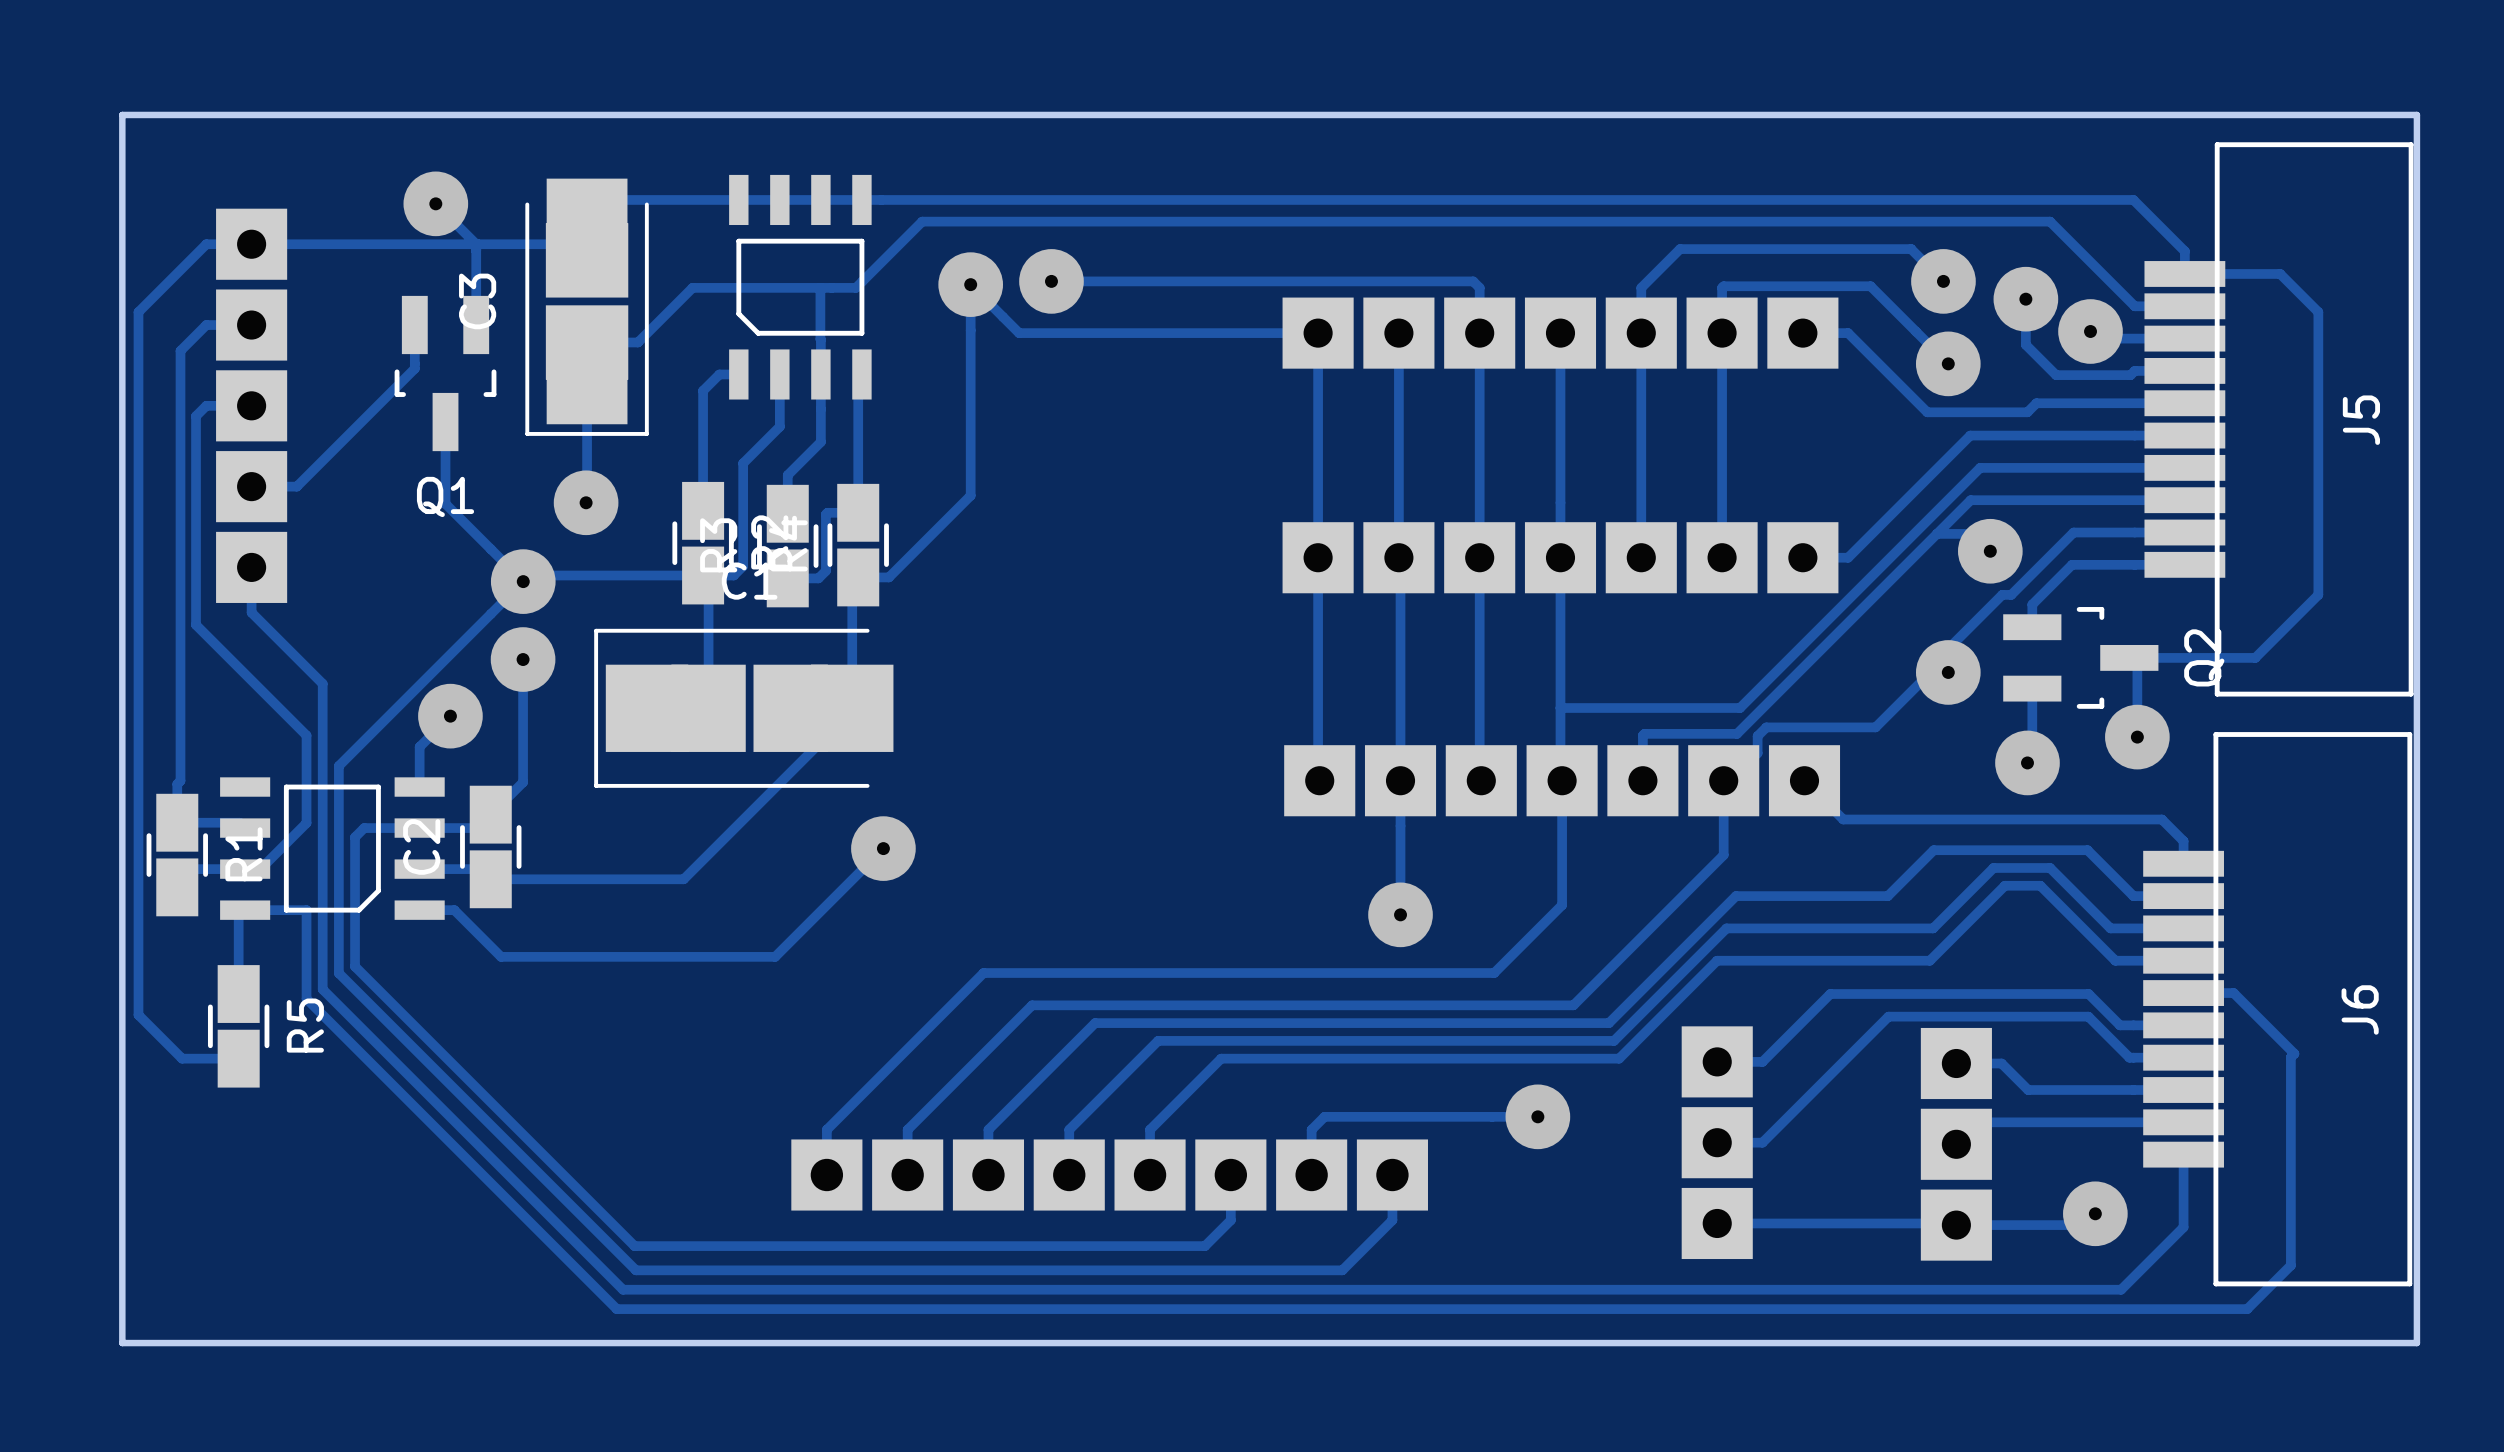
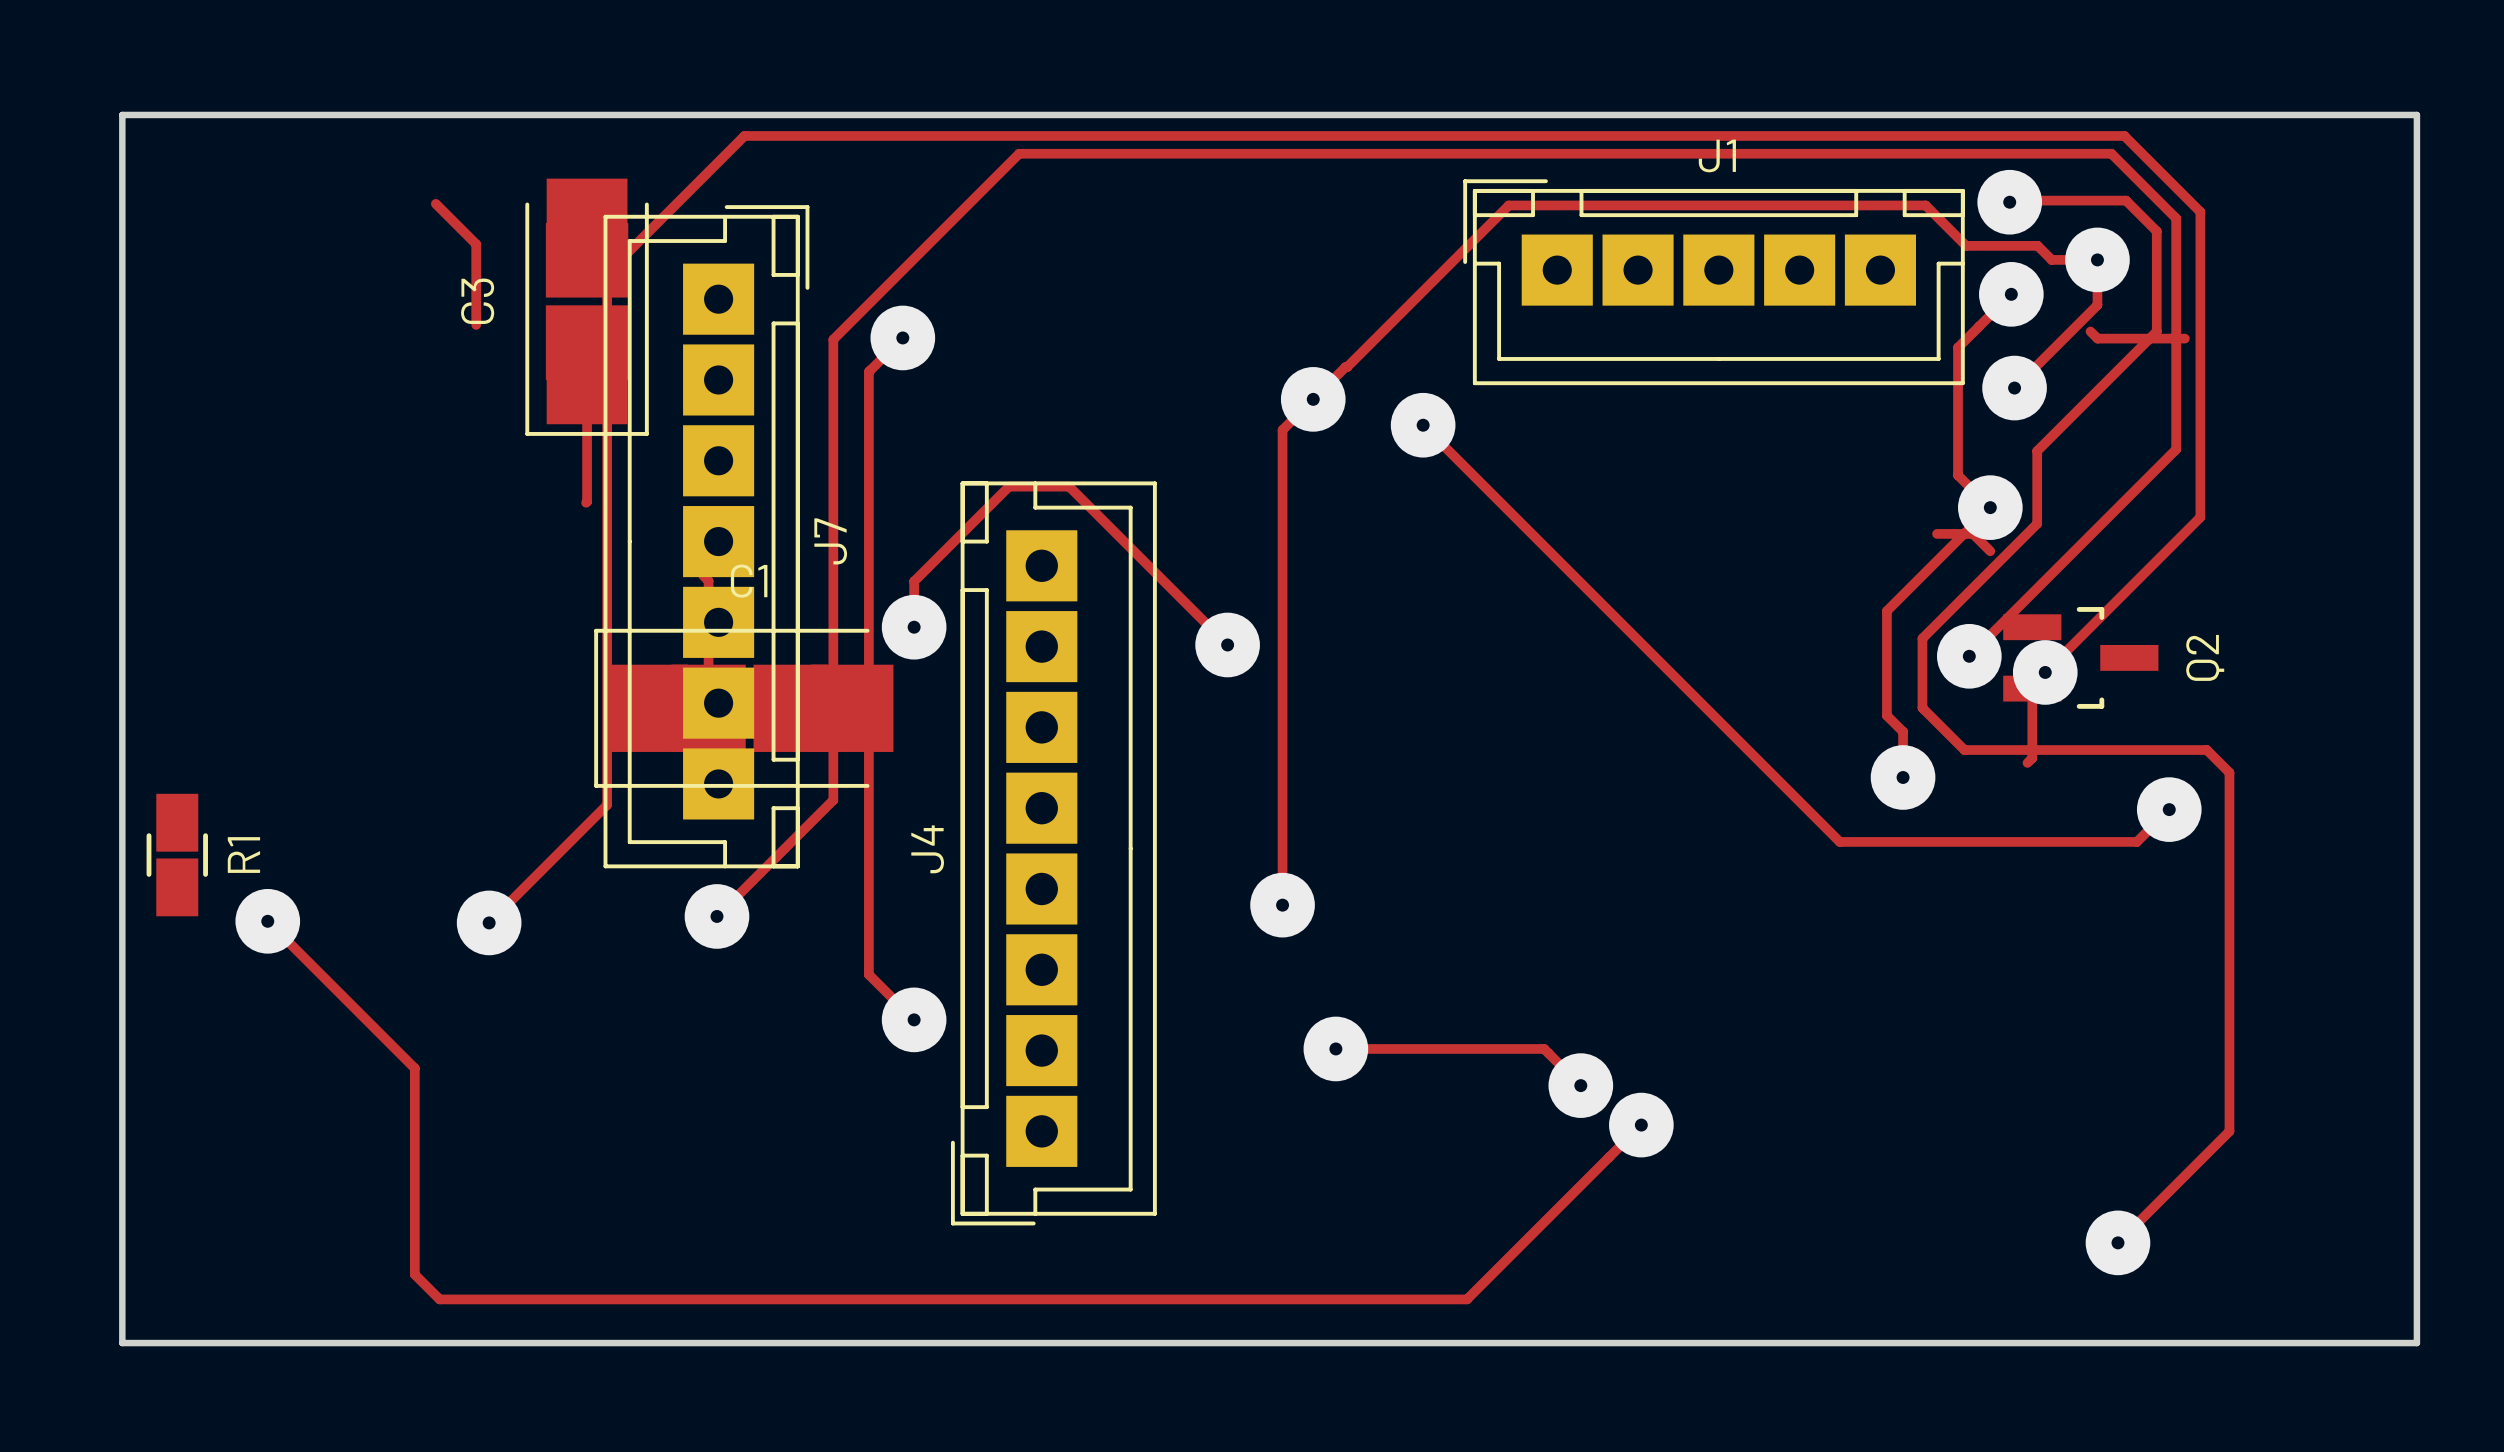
track: none -> (2009, 202) (2011, 200) (2126, 200) (2156, 231) (2156, 331) (2037, 451) (2037, 523) (1922, 638) (1922, 708) (1964, 750) (2206, 750) (2229, 772) (2229, 1131) (2117, 1242)
via: none -> (2009, 202)
via: (435, 203) -> none
track: (587, 219) (606, 199) (2133, 199) (2184, 251) (2184, 273) (2280, 273) (2318, 312) (2318, 594) (2255, 657) (2129, 657) (2137, 665) (2137, 737) -> none
via: none -> (2097, 259)
track: (587, 260) (570, 244) (206, 244) (138, 312) (138, 1015) (182, 1058) (238, 1058) -> none
track: (1051, 281) (1473, 281) (1479, 287) (1479, 779) (1481, 780) -> none
via: (1051, 281) -> none
track: (1943, 281) (1911, 249) (1680, 249) (1641, 287) (1641, 557) -> none
via: (1943, 281) -> none
J1: none -> (1714, 282)
via: (970, 284) -> none
part: (800, 287) -> none
track: (820, 287) (820, 442) (787, 475) (787, 513) -> none
track: none -> (2011, 294) (1958, 347) (1958, 475) (1990, 507) (1886, 611) (1886, 715) (1903, 731) (1903, 777)
track: (2025, 299) (2025, 344) (2056, 375) (2130, 375) (2134, 370) (2184, 370) -> none
via position: (2025, 299) -> (2011, 294)
track: (2184, 306) (2134, 306) (2050, 221) (922, 221) (855, 287) (692, 287) (637, 342) (587, 342) -> none
track: (251, 325) (206, 325) (180, 350) (180, 780) (177, 784) (177, 822) (239, 822) (245, 828) -> none
track: (414, 325) (414, 368) (296, 486) (251, 486) -> none
via: (2090, 331) -> none
track: (1398, 333) (1400, 914) -> none
track: (1560, 333) (1562, 905) (1494, 973) (983, 973) (826, 1129) (826, 1175) -> none
part: (1560, 333) -> none
track: (1802, 333) (1848, 333) (1927, 412) (2027, 412) (2036, 403) (2184, 403) -> none
track: none -> (902, 337) (868, 371) (868, 974) (914, 1019)
via: none -> (902, 337)
track: (1948, 363) (1870, 286) (1723, 286) (1722, 287) (1722, 557) -> none
via: (1948, 363) -> none
Q1: (445, 373) -> none
track: (738, 374) (719, 374) (703, 390) (703, 510) -> none
track: (779, 374) (779, 426) (743, 463) (743, 566) (733, 575) (529, 575) (338, 766) (338, 973) (635, 1270) (1342, 1270) (1392, 1220) (1392, 1175) -> none
track: (861, 374) (858, 378) (858, 512) (827, 512) (825, 514) (825, 570) (818, 578) (787, 578) -> none
track: none -> (2014, 388) (2097, 305) (2097, 259) (2051, 259) (2037, 245) (1966, 245) (1925, 205) (1508, 205) (1282, 430) (1282, 905)
via: none -> (2014, 388)
via: none -> (1313, 399)
track: (251, 405) (206, 405) (196, 416) (196, 624) (306, 735) (306, 823) (260, 869) (195, 869) (177, 887) -> none
part: (251, 405) -> none
J5: (2279, 419) -> none
track: (445, 422) (445, 503) (523, 581) -> none
track: none -> (1423, 425) (1839, 841) (2136, 841) (2169, 809)
via: none -> (1423, 425)
track: (2184, 435) (1970, 435) (1848, 557) (1802, 557) -> none
track: (2184, 467) (1980, 467) (1740, 708) (1560, 708) -> none
track: (2184, 500) (1970, 500) (1737, 733) (1644, 733) (1642, 735) (1642, 780) -> none
via: (586, 502) -> none
track: (2184, 532) (2073, 532) (2011, 594) (2002, 594) (1938, 658) (1938, 664) -> none
J7: none -> (706, 536)
part: (703, 543) -> none
part: (858, 545) -> none
part: (787, 546) -> none
via position: (1990, 551) -> (1990, 507)
part: (1560, 557) -> none
track: (2184, 564) (2072, 564) (2032, 604) (2032, 627) -> none
track: (251, 567) (251, 612) (322, 683) (322, 989) (623, 1289) (2121, 1289) (2183, 1227) (2183, 1154) -> none
via: (523, 581) -> none
track: none -> (914, 627) (914, 581) (1009, 486) (1069, 486) (1227, 644)
via: none -> (914, 627)
via: none -> (1227, 644)
track: none -> (1969, 656) (2176, 449) (2176, 218) (2111, 153) (1019, 153) (833, 339) (833, 800) (716, 916)
track: (523, 659) (523, 782) (477, 828) (364, 828) (355, 837) (355, 966) (634, 1246) (1204, 1246) (1230, 1220) (1230, 1175) -> none
via: (523, 659) -> none
track: (1938, 664) (1875, 727) (1766, 727) (1757, 736) (1757, 753) (1730, 780) (1723, 780) (1723, 855) (1573, 1005) (1032, 1005) (907, 1129) (907, 1175) -> none
via position: (1948, 672) -> (1969, 656)
track: none -> (2045, 672) (2200, 517) (2200, 211) (2124, 135) (744, 135) (607, 273) (607, 804) (489, 922)
via: none -> (2045, 672)
track: (450, 716) (419, 746) (419, 787) -> none
via: (450, 716) -> none
via: (2137, 737) -> none
via: (2027, 762) -> none
via: none -> (1903, 777)
track: (1319, 780) (1318, 779) (1318, 333) (1019, 333) (970, 284) (970, 495) (888, 577) (858, 577) (852, 583) (852, 710) (683, 879) (490, 879) (480, 869) (419, 869) -> none
part: (1562, 780) -> none
track: (1804, 780) (1843, 819) (2161, 819) (2183, 841) (2183, 863) -> none
via: none -> (2169, 809)
part: (490, 846) -> none
part: (332, 848) -> none
track: (883, 848) (775, 956) (501, 956) (454, 910) (419, 910) -> none
via: (883, 848) -> none
track: (2183, 896) (2133, 896) (2087, 850) (1933, 850) (1887, 896) (1735, 896) (1608, 1023) (1095, 1023) (988, 1129) (988, 1175) -> none
via: none -> (1282, 905)
via: (1400, 914) -> none
via: none -> (716, 916)
track: none -> (267, 921) (414, 1068) (414, 1274) (439, 1299) (1466, 1299) (1641, 1125)
via: none -> (267, 921)
via: none -> (489, 922)
track: (2183, 928) (2110, 928) (2050, 867) (1993, 867) (1933, 928) (1726, 928) (1614, 1040) (1158, 1040) (1069, 1129) (1069, 1175) -> none
track: (2183, 960) (2115, 960) (2040, 885) (2004, 885) (1929, 960) (1717, 960) (1619, 1058) (1221, 1058) (1150, 1129) (1150, 1175) -> none
track: (2183, 993) (2233, 993) (2294, 1053) (2290, 1057) (2290, 1265) (2247, 1309) (616, 1309) (306, 998) (306, 910) (245, 910) (238, 916) (238, 994) -> none
J6: (2277, 1009) -> none
via: none -> (914, 1019)
track: (2183, 1025) (2120, 1025) (2088, 994) (1830, 994) (1762, 1061) (1717, 1061) -> none
R5: (238, 1026) -> none
track: none -> (1335, 1048) (1544, 1048) (1580, 1085)
via: none -> (1335, 1048)
track: (2183, 1057) (2129, 1057) (2088, 1016) (1888, 1016) (1762, 1142) (1717, 1142) -> none
track: (1956, 1063) (2001, 1063) (2028, 1090) (2183, 1090) -> none
via: none -> (1580, 1085)
track: (1537, 1116) (1324, 1116) (1311, 1129) (1311, 1175) -> none
via: (1537, 1116) -> none
track: (2183, 1122) (1978, 1122) (1956, 1144) -> none
via: none -> (1641, 1125)
part: (1717, 1142) -> none
part: (1956, 1144) -> none
J4 side: bottom (1109, 1175) -> top (1053, 853)
track: (2095, 1213) (2084, 1225) (1717, 1223) -> none
via position: (2095, 1213) -> (2117, 1242)

